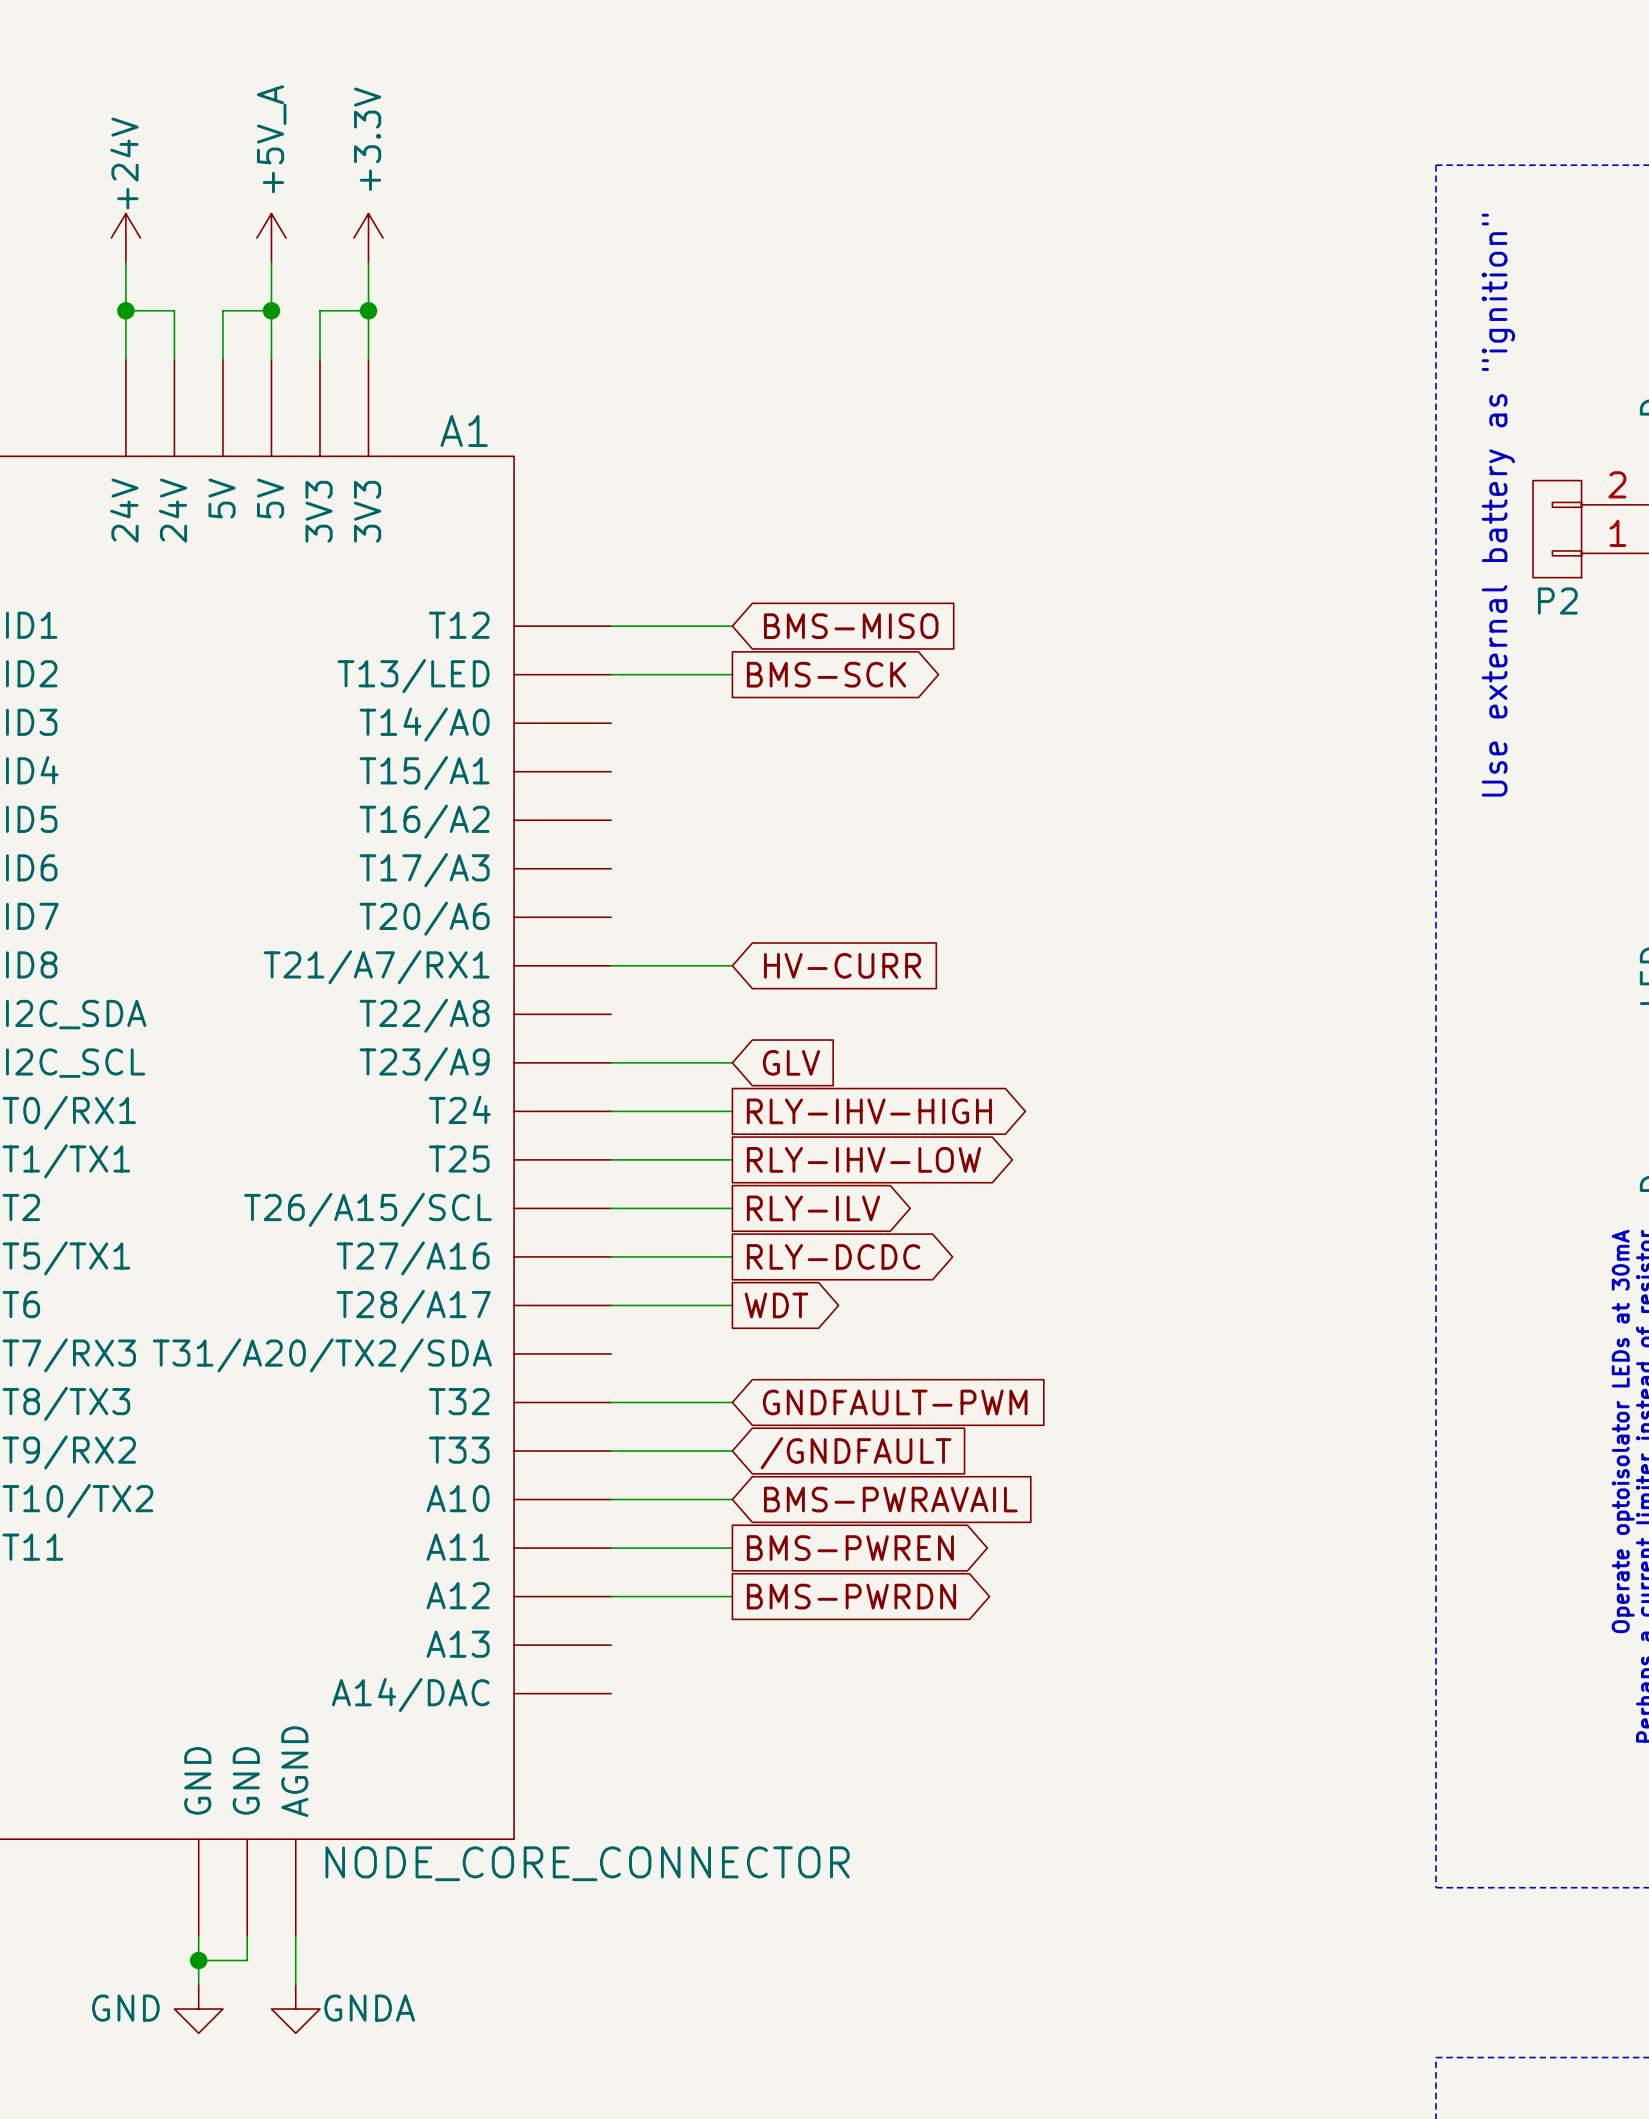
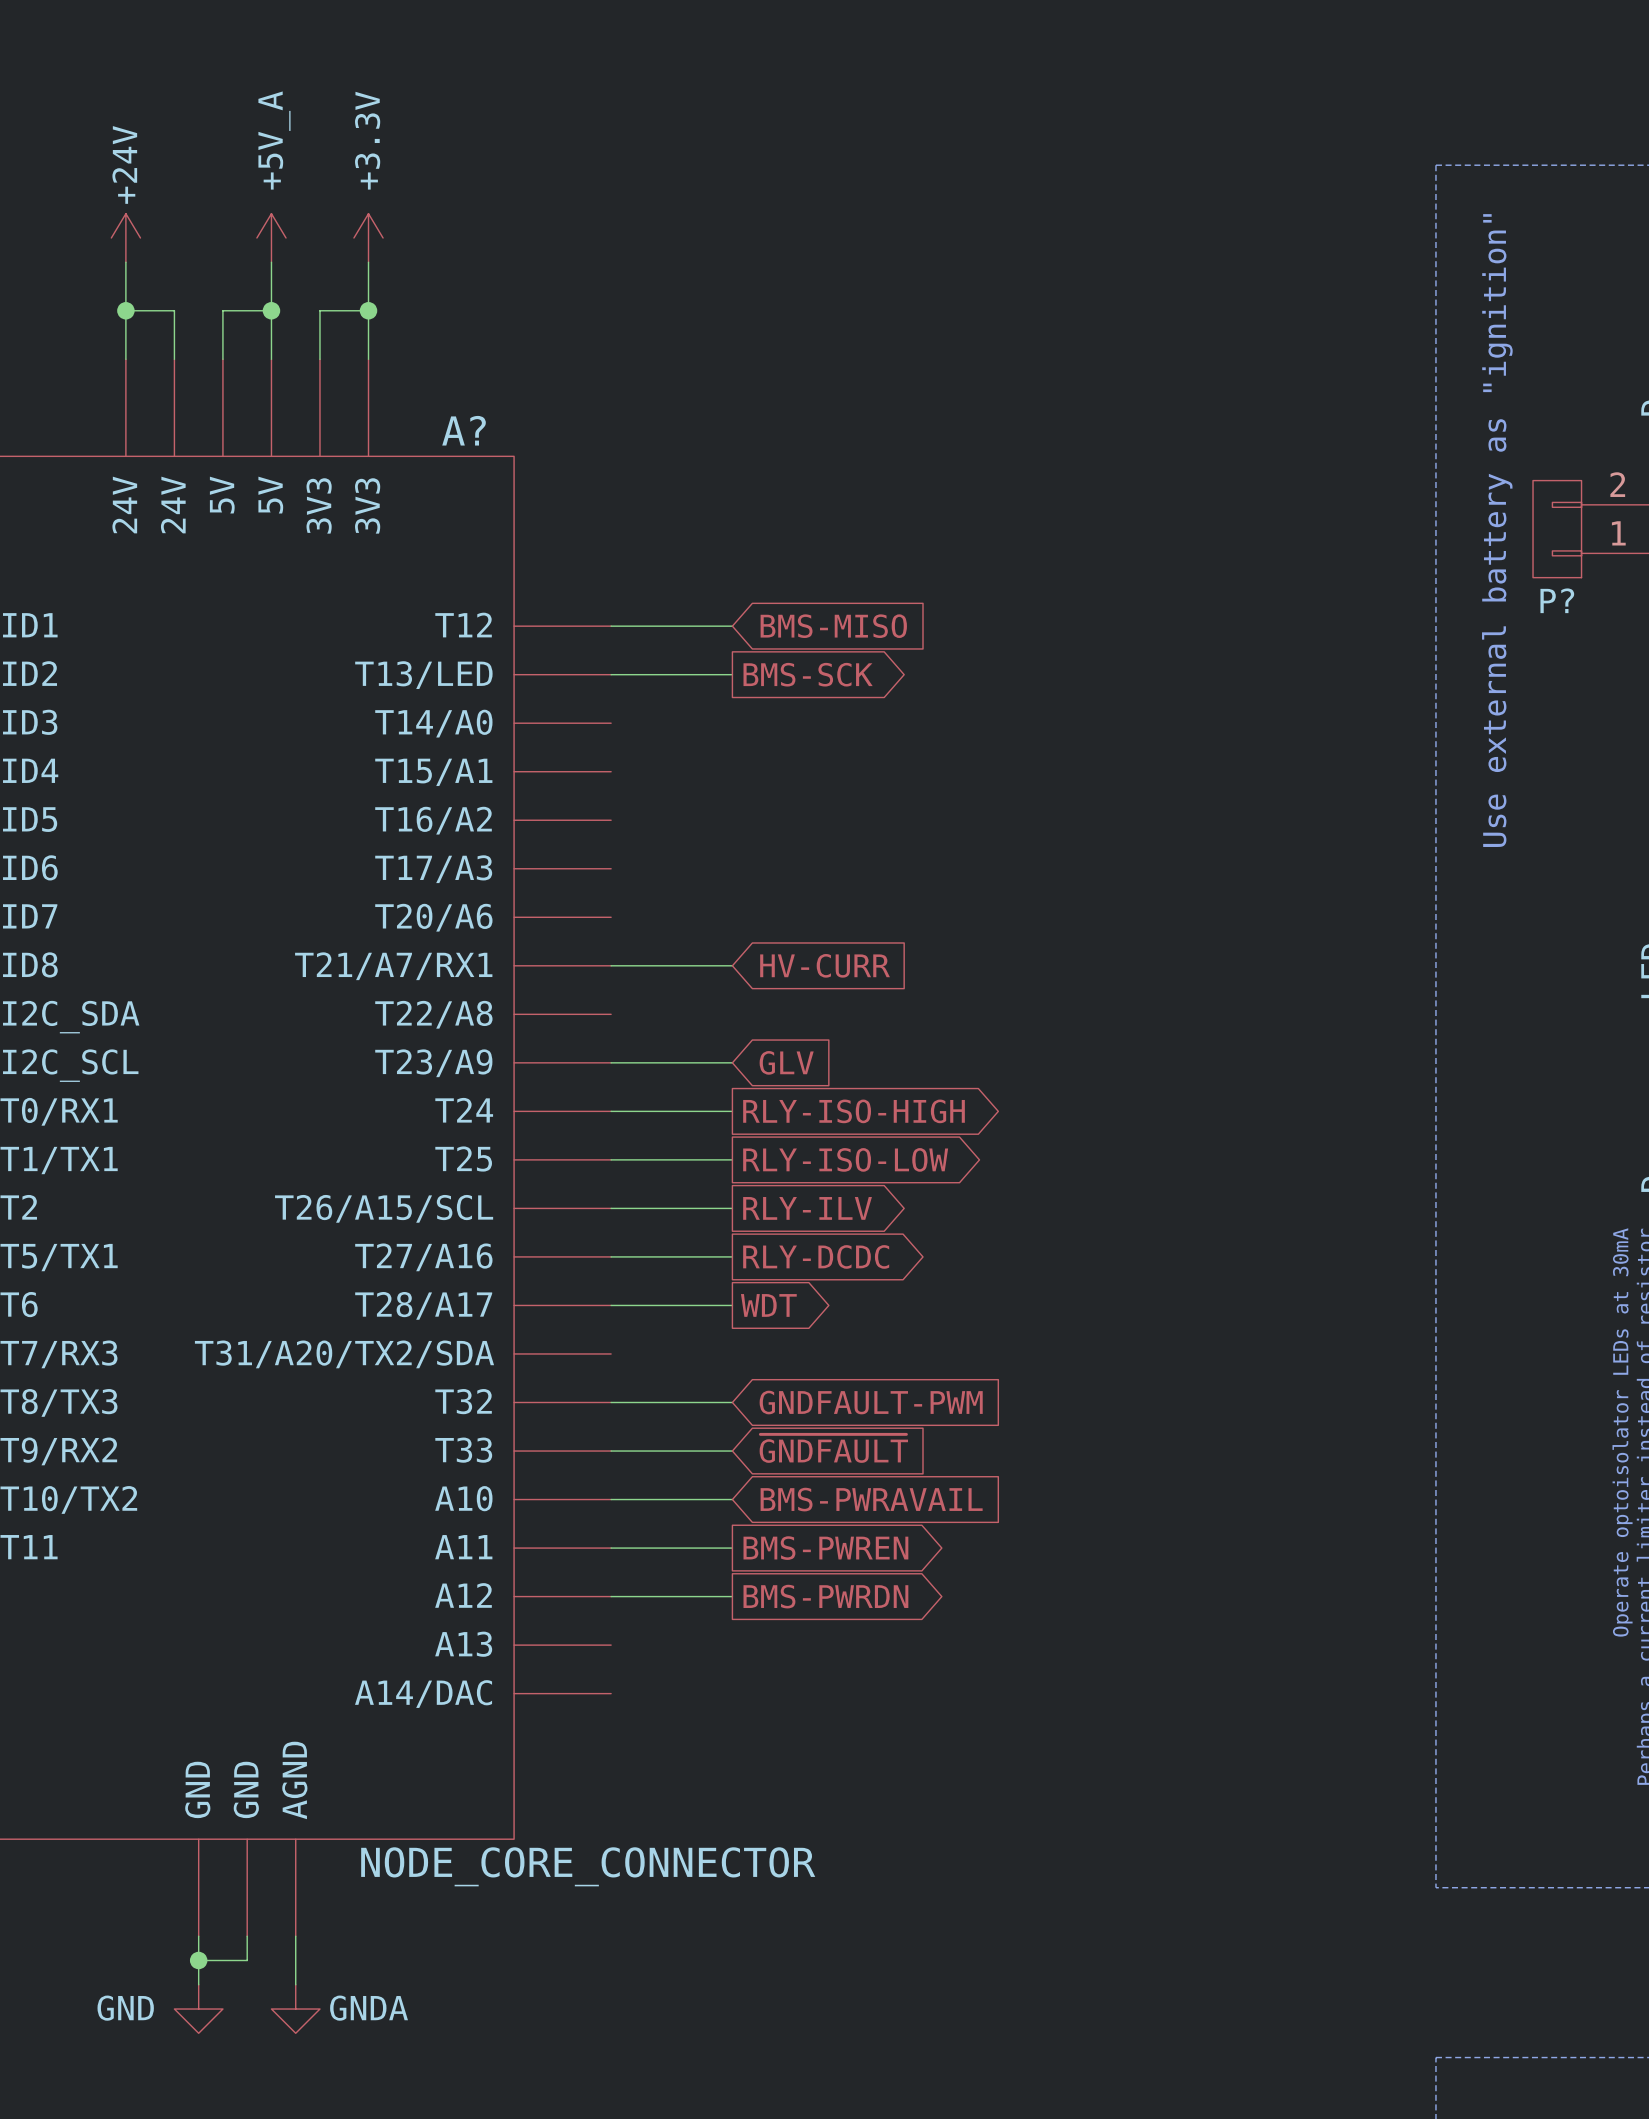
A1 name: A1 (464, 430) -> A? (464, 430)
P2 name: P2 (1557, 600) -> P? (1557, 600)
global label: RLY-IHV-HIGH (869, 1111) -> RLY-ISO-HIGH (854, 1111)
global label: RLY-IHV-LOW (863, 1159) -> RLY-ISO-LOW (845, 1159)
global label: /GNDFAULT (856, 1453) -> ~{GNDFAULT} (833, 1448)

